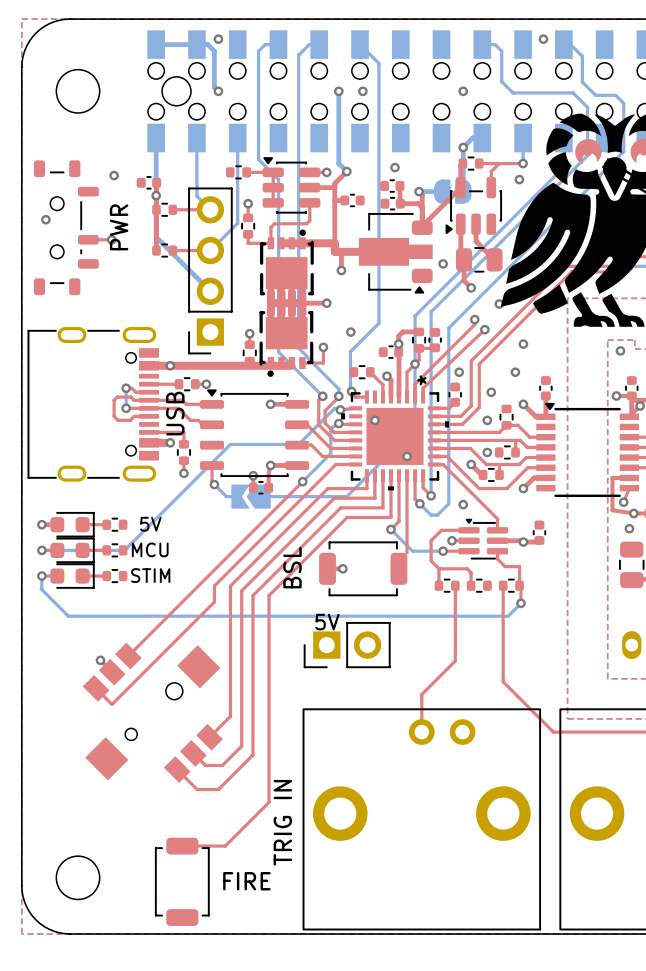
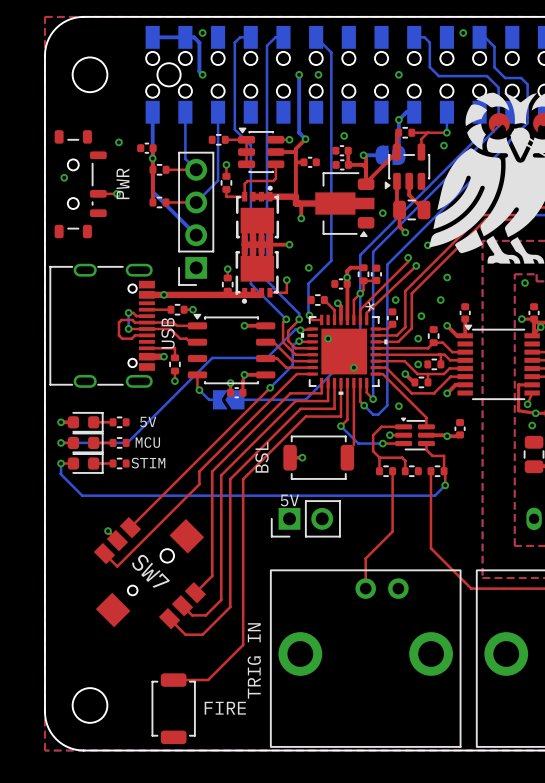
SW7 name: none -> SW7 (151, 571)

